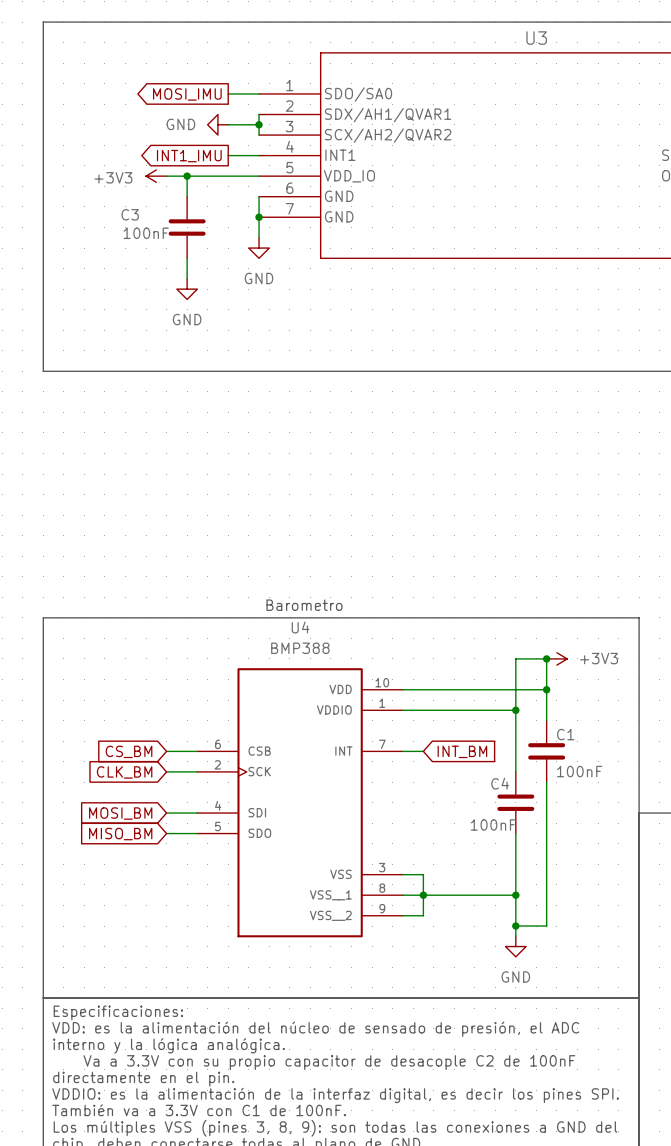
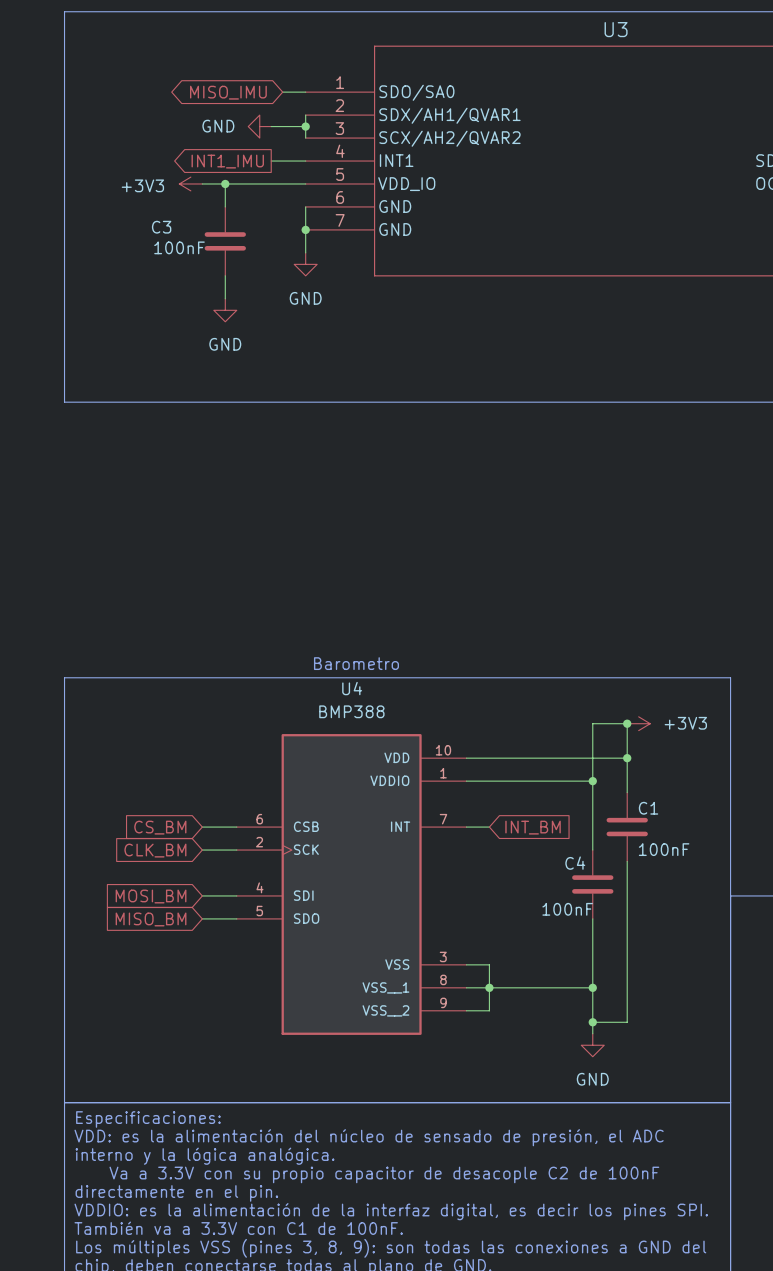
wire: (228, 93) (238, 93) -> none
global label shape: output (187, 94) -> bidirectional (228, 92)
global label: MOSI_IMU (187, 94) -> MISO_IMU (228, 92)

